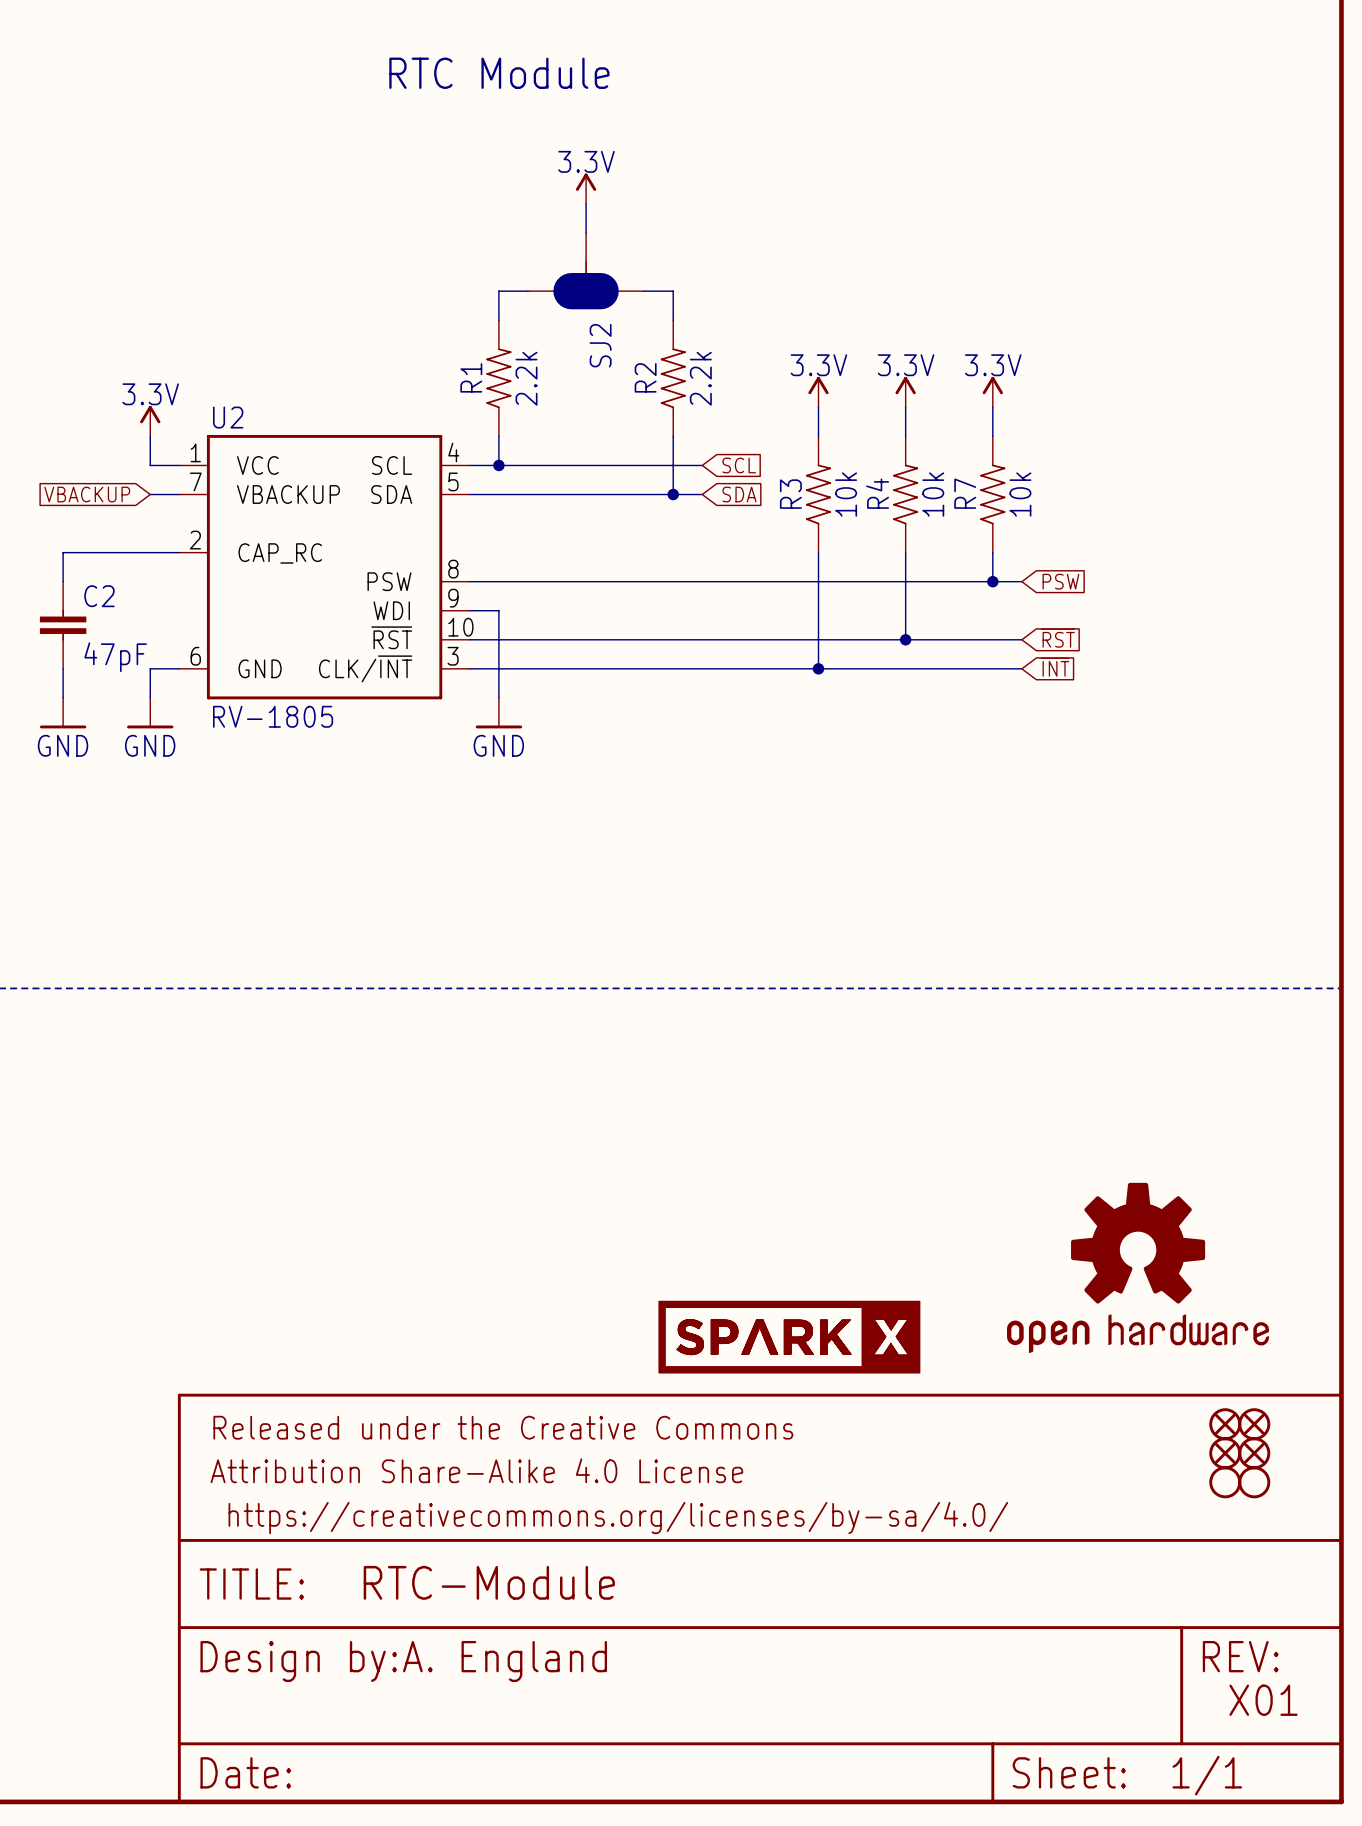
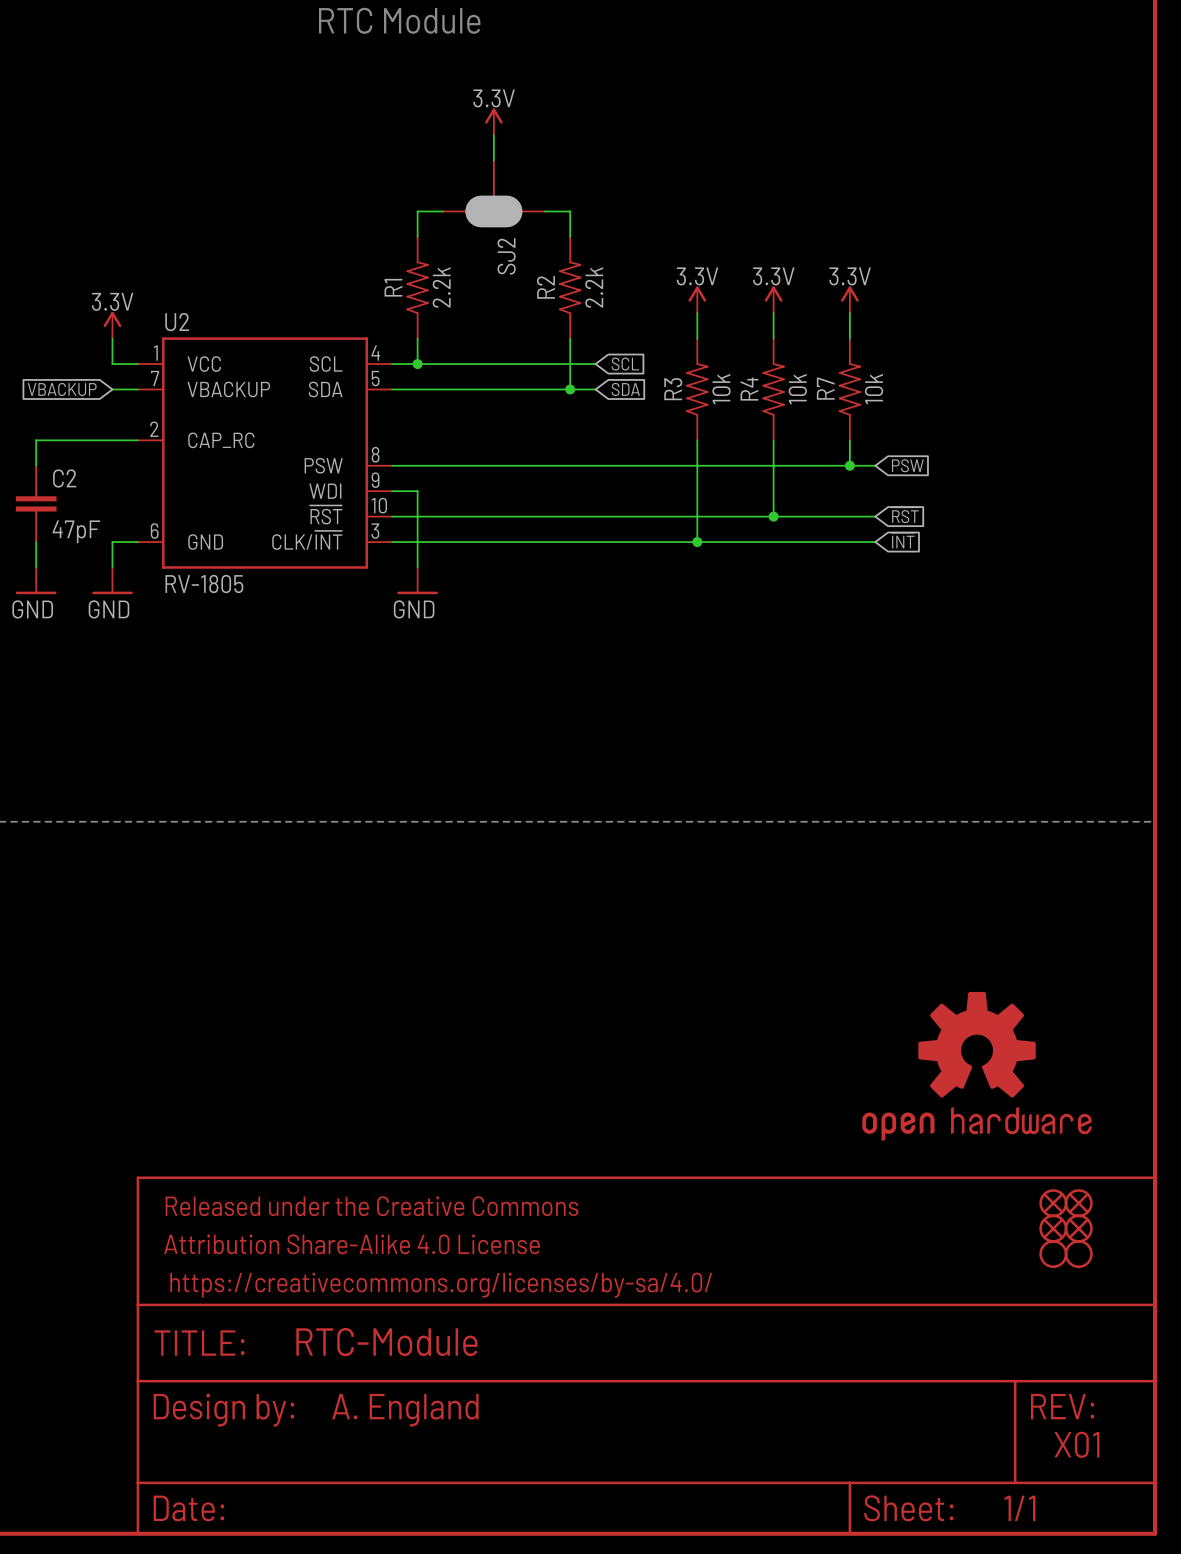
part: (789, 1337) -> none

